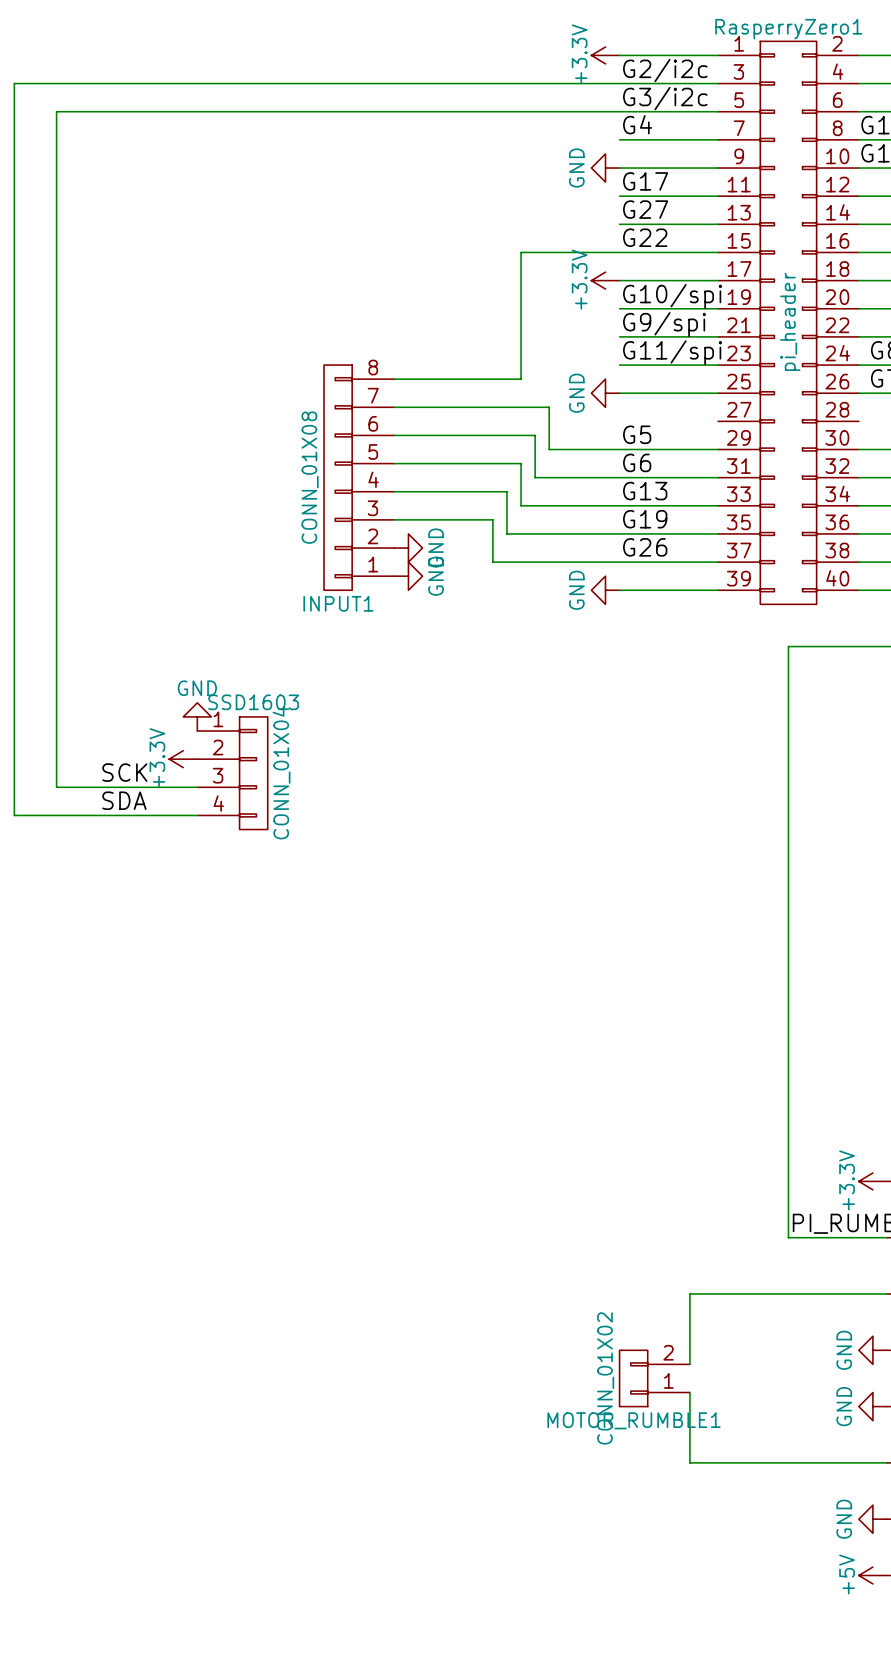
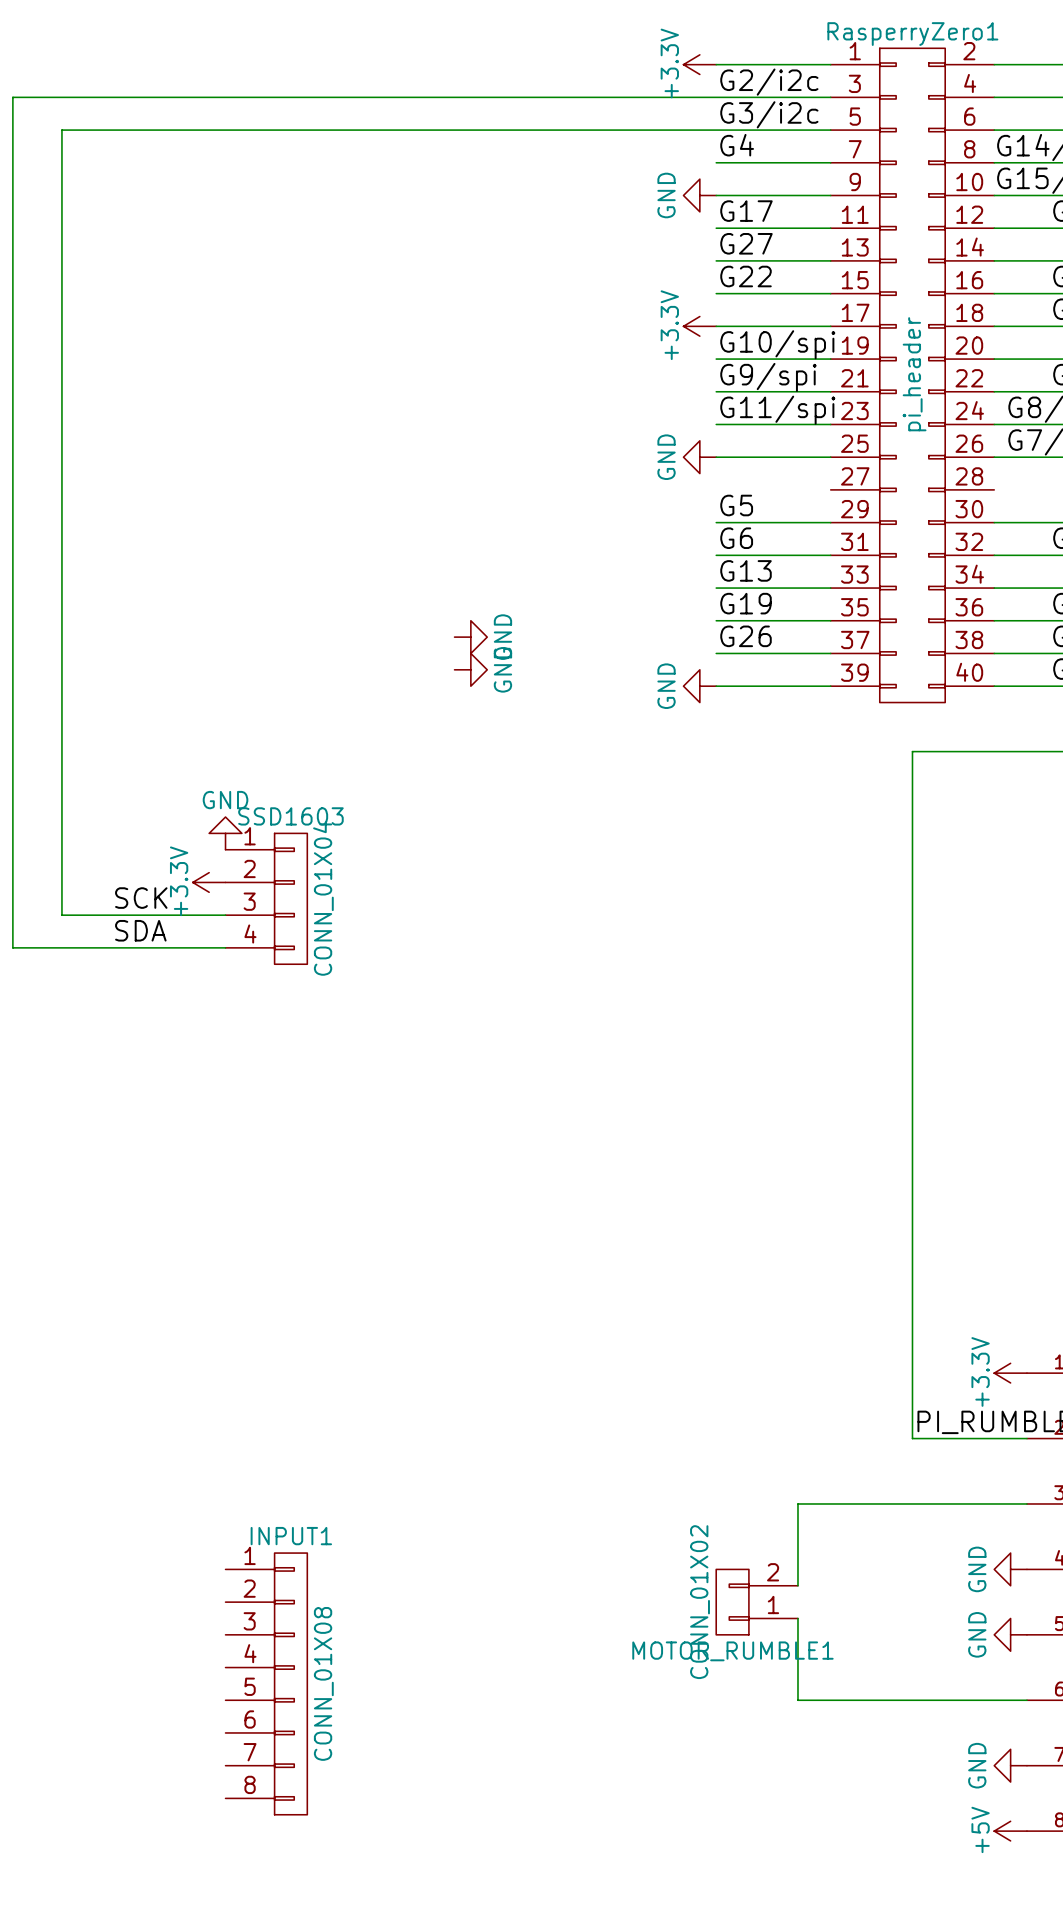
wire: (619, 252) (521, 252) (521, 379) (394, 379) -> none
wire: (394, 407) (549, 407) (549, 449) (619, 449) -> none
wire: (394, 435) (535, 435) (535, 477) (619, 477) -> none
wire: (394, 463) (521, 463) (521, 505) (619, 505) -> none
INPUT1 rotation: 0° (338, 477) -> 180° (290, 1683)
INPUT1 position: (359, 477) -> (266, 1683)
wire: (394, 491) (506, 491) (506, 533) (619, 533) -> none
wire: (394, 519) (492, 519) (492, 562) (619, 562) -> none

